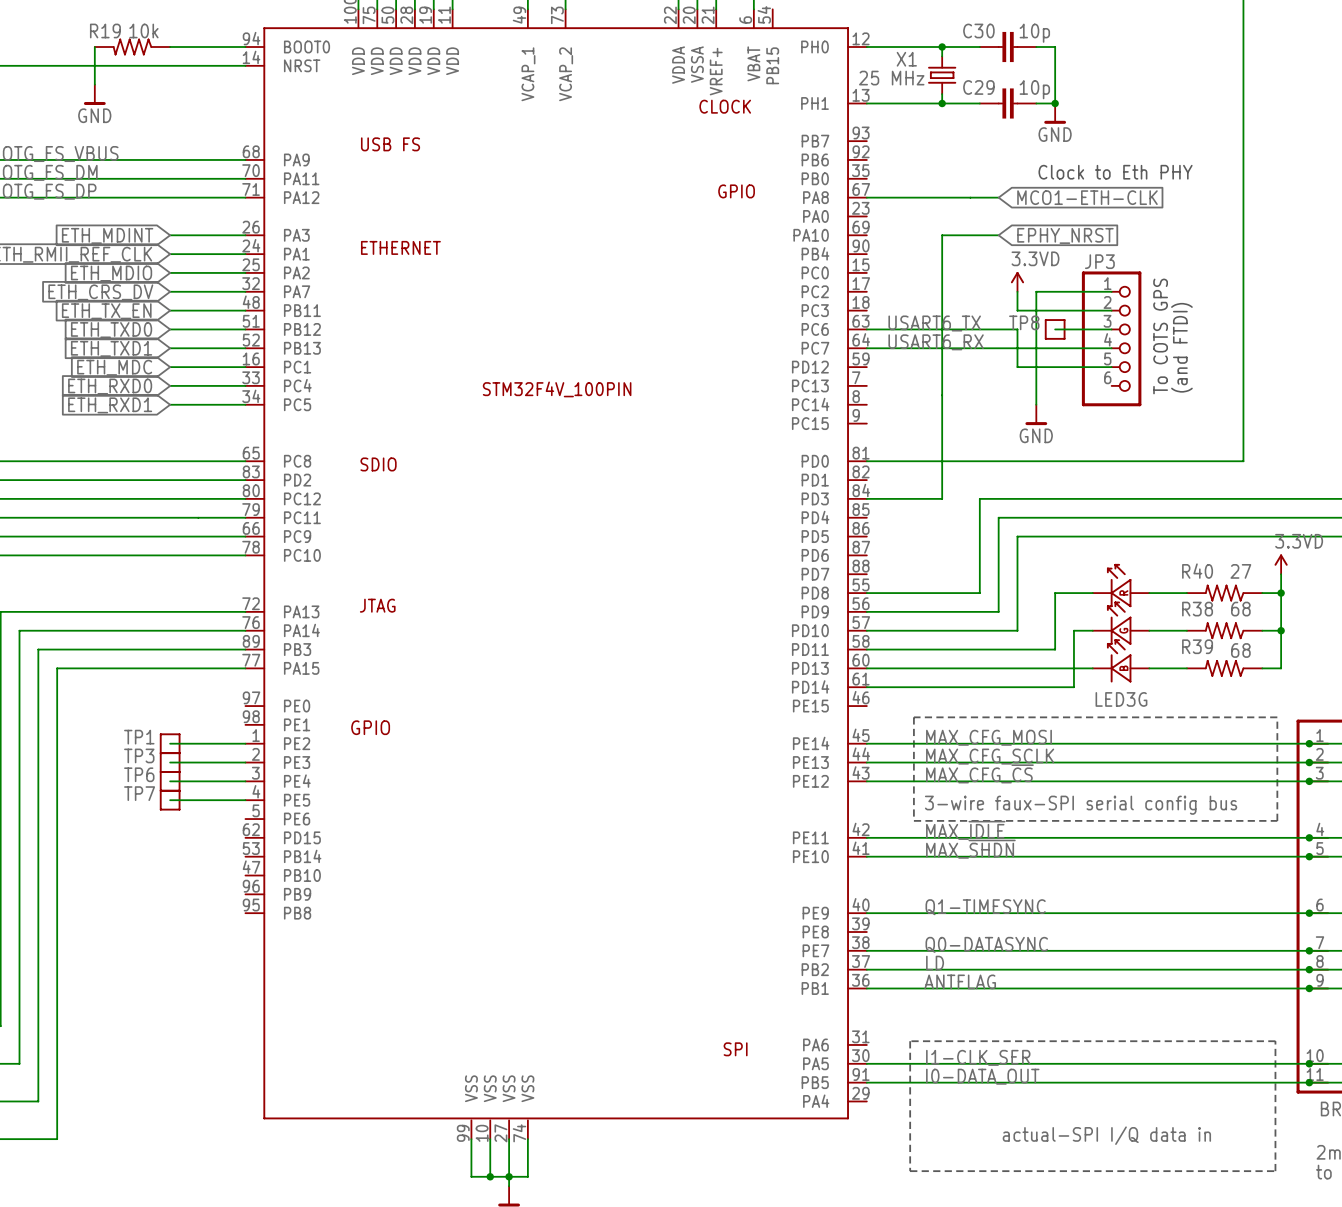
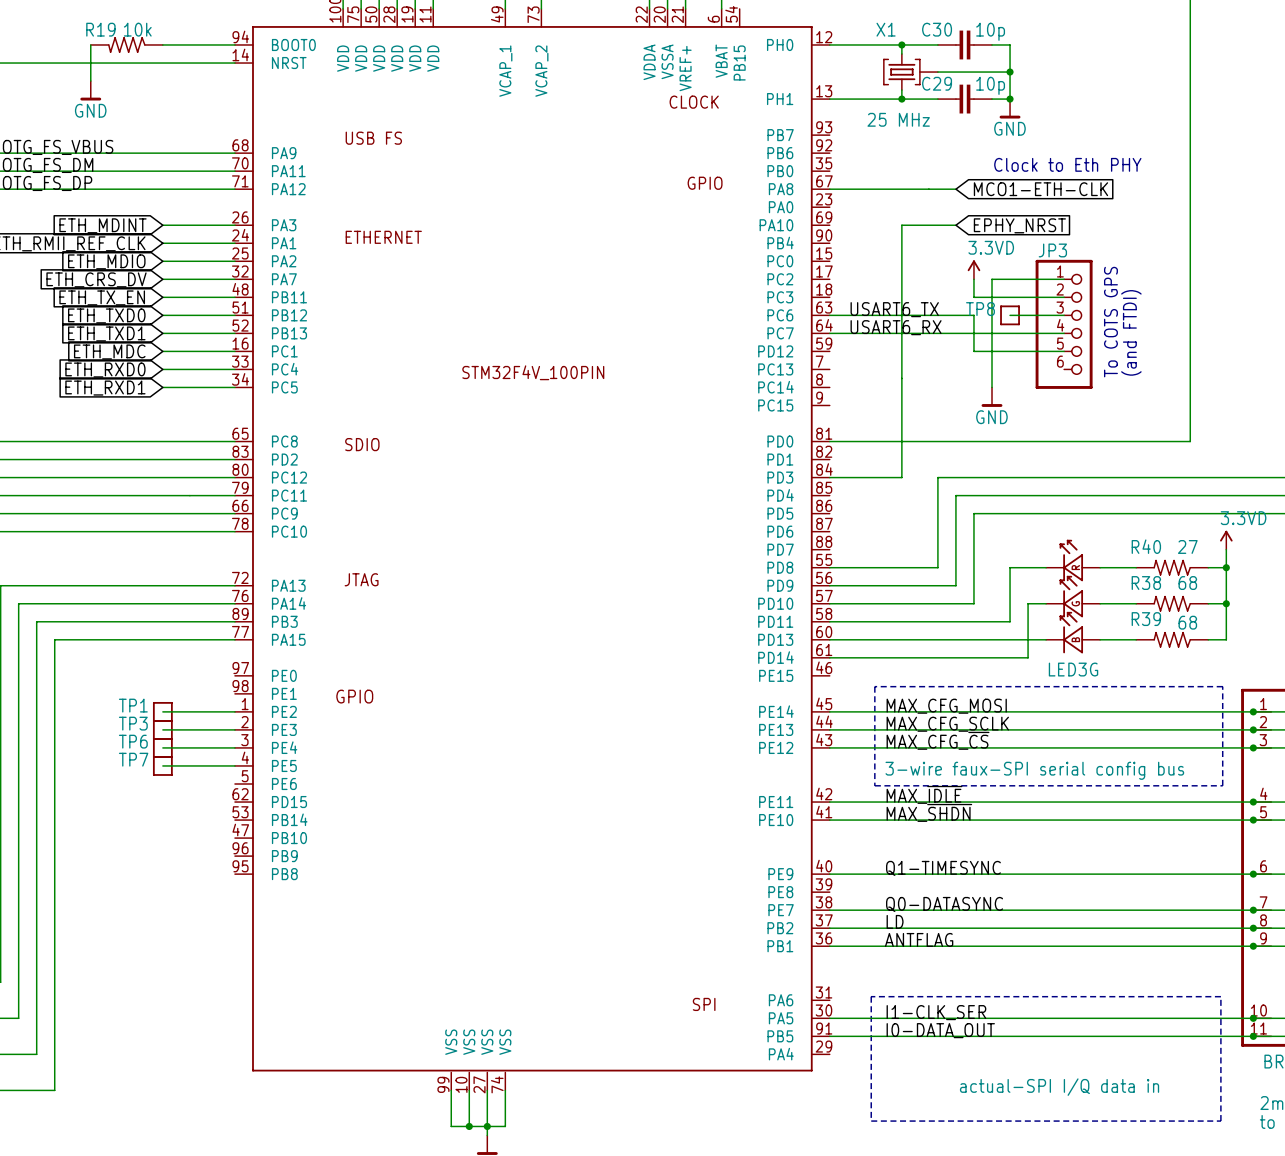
X1 symbol: [928, 55, 957, 95] -> [883, 53, 938, 91]
X1 name position: X1 (906, 59) -> X1 (886, 29)
wire: none -> (937, 72) (1010, 72)
junction: none -> (1010, 72)
X1 value position: 25 MHz (891, 78) -> 25 MHz (898, 119)

